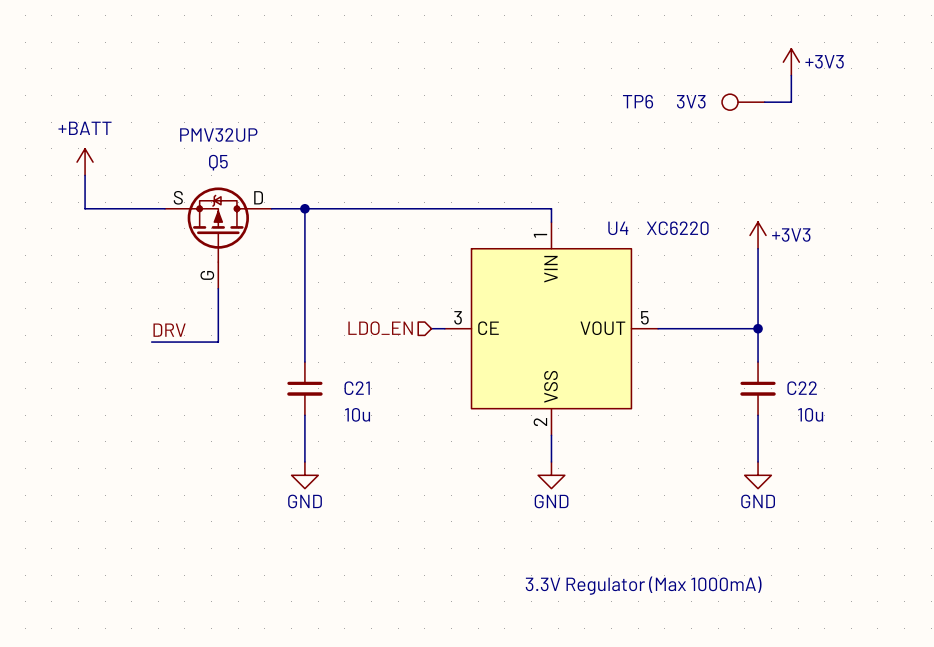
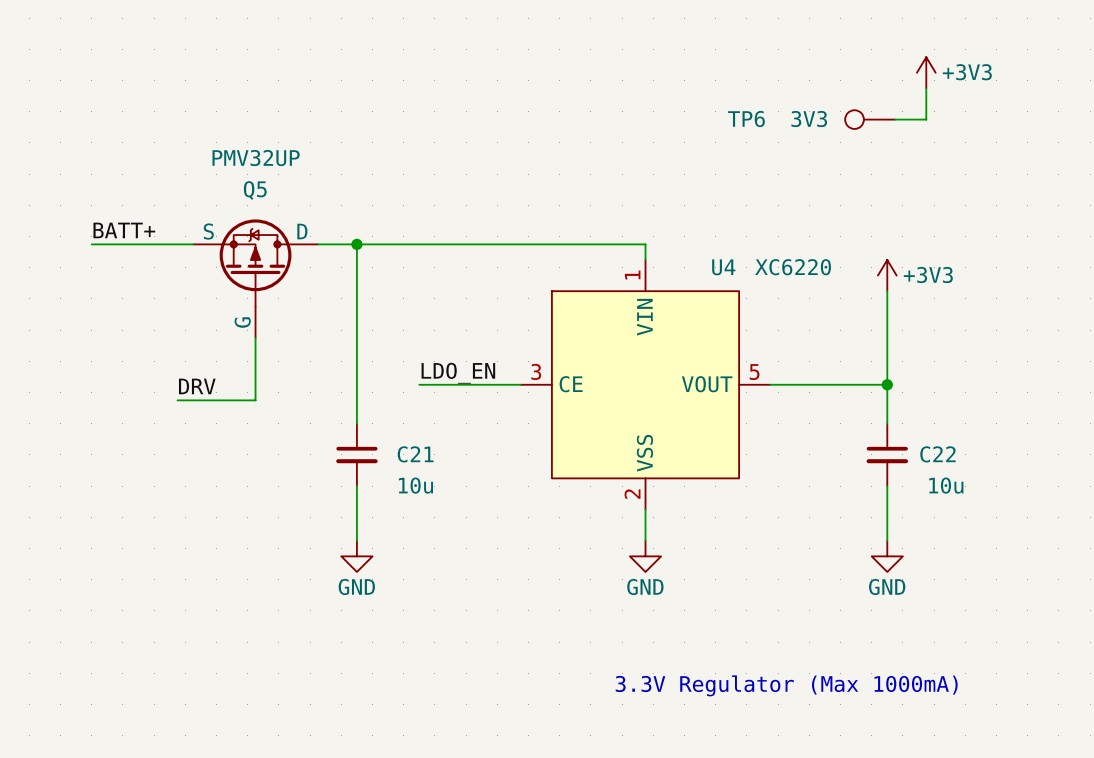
power symbol: +BATT (85, 162) -> none
wire: (85, 175) (85, 208) -> (91, 244) (99, 244)
label: none -> BATT+ (124, 230)
label: none -> LDO_EN (458, 373)
wire: none -> (419, 384) (505, 384)
hierarchical label: LDO_EN (380, 328) -> none

